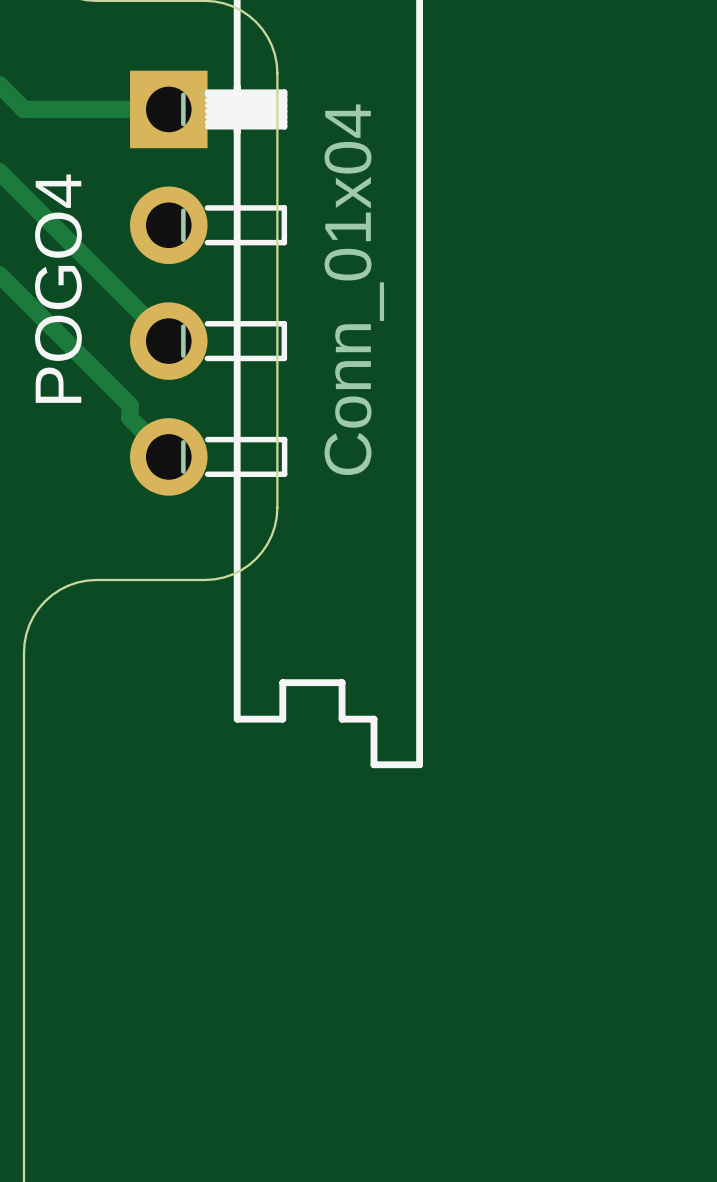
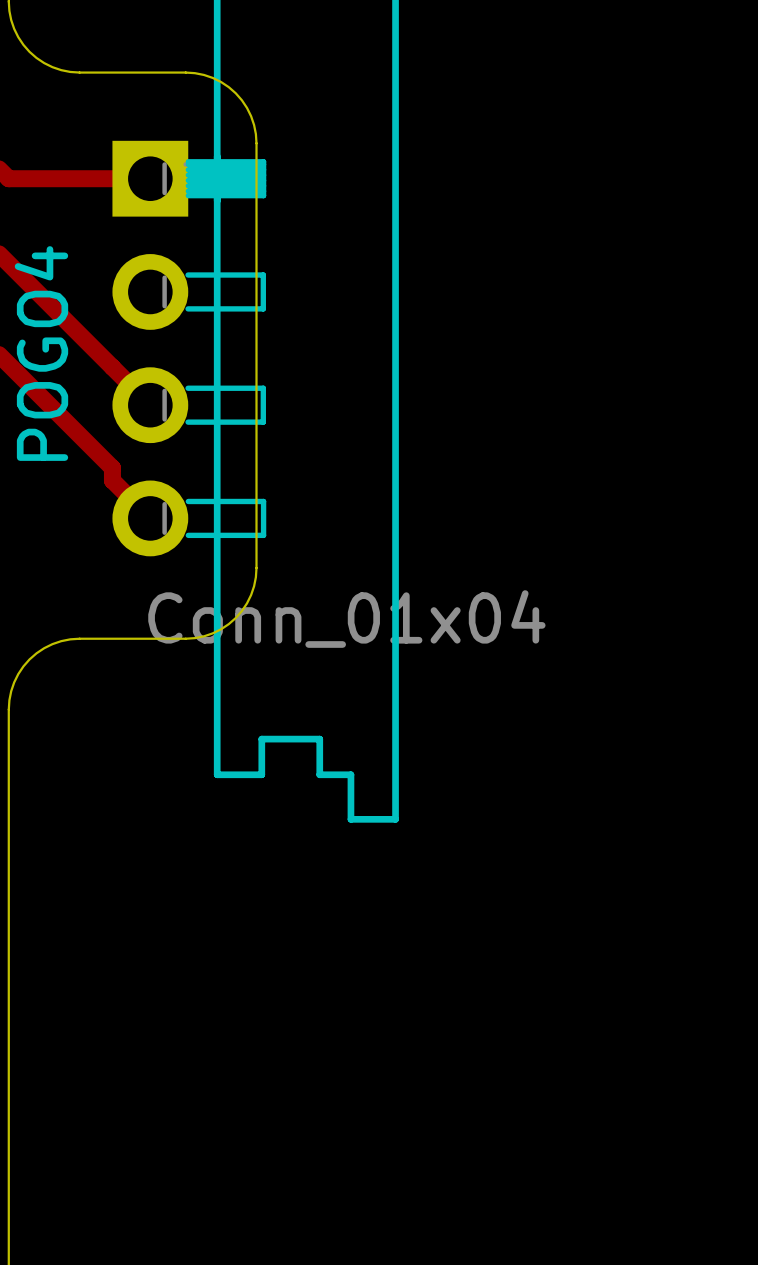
POGO4 value rotation: 0° (354, 289) -> 90° clockwise (346, 619)

